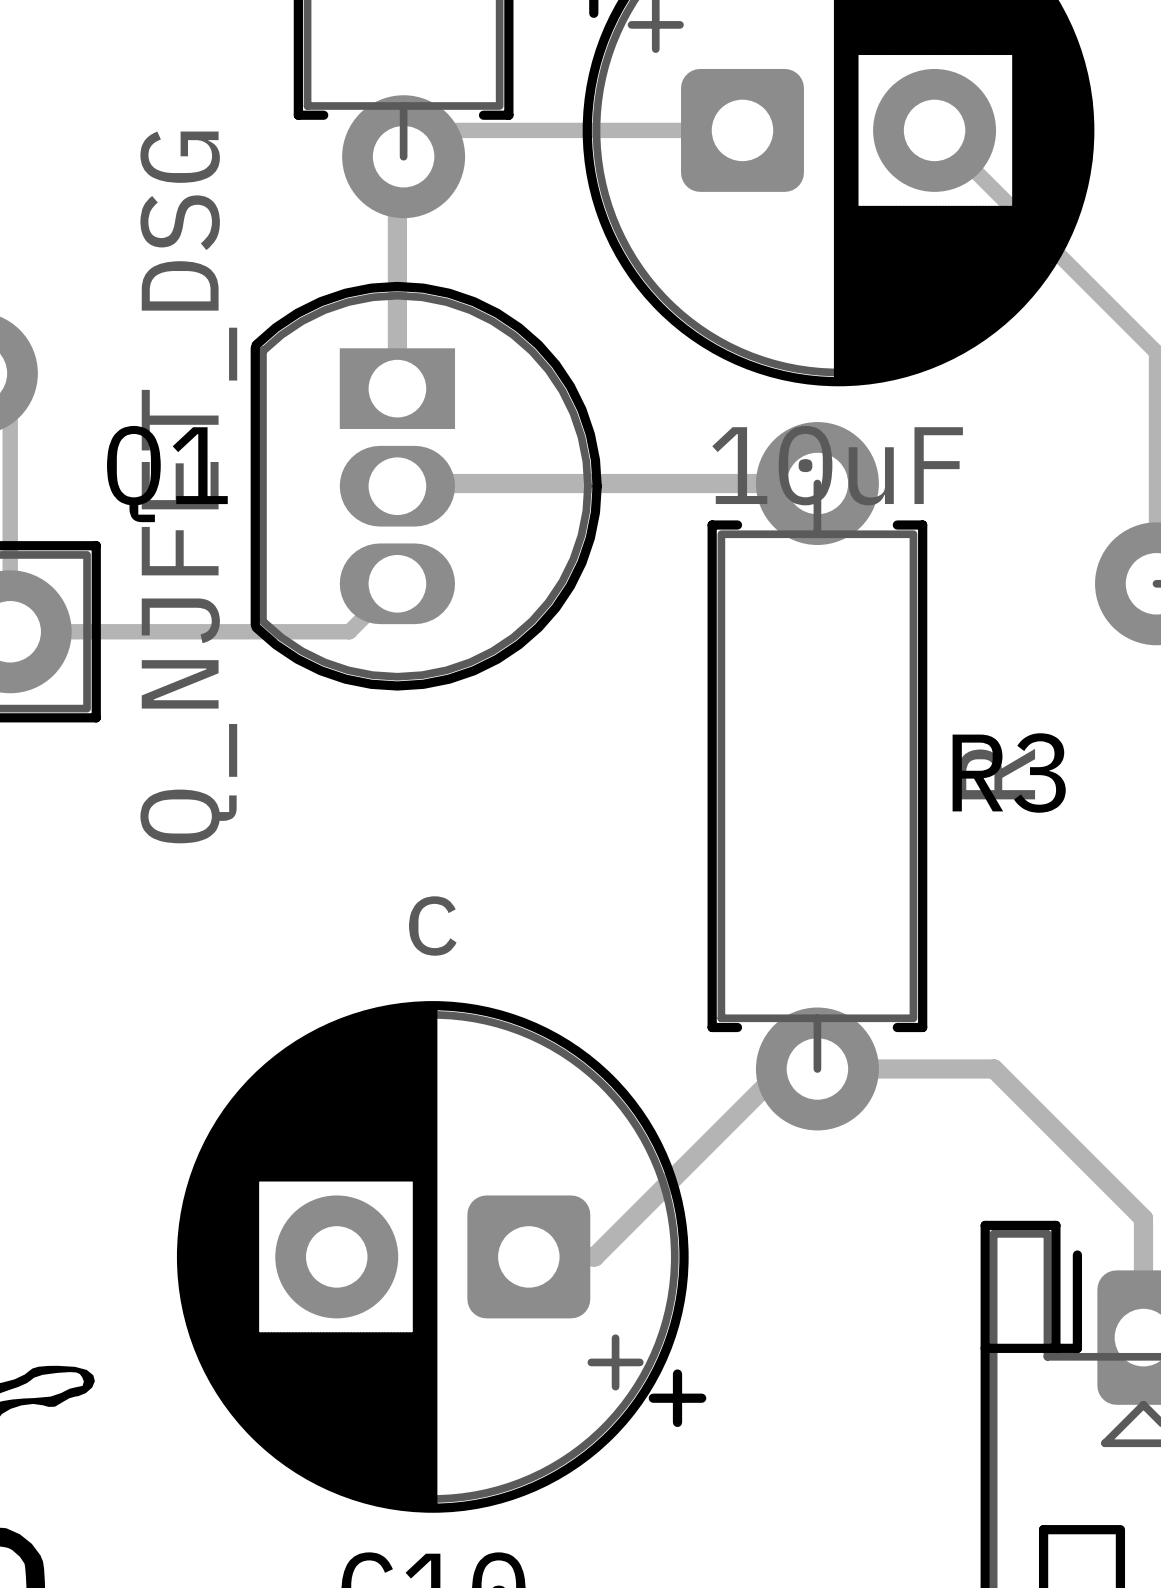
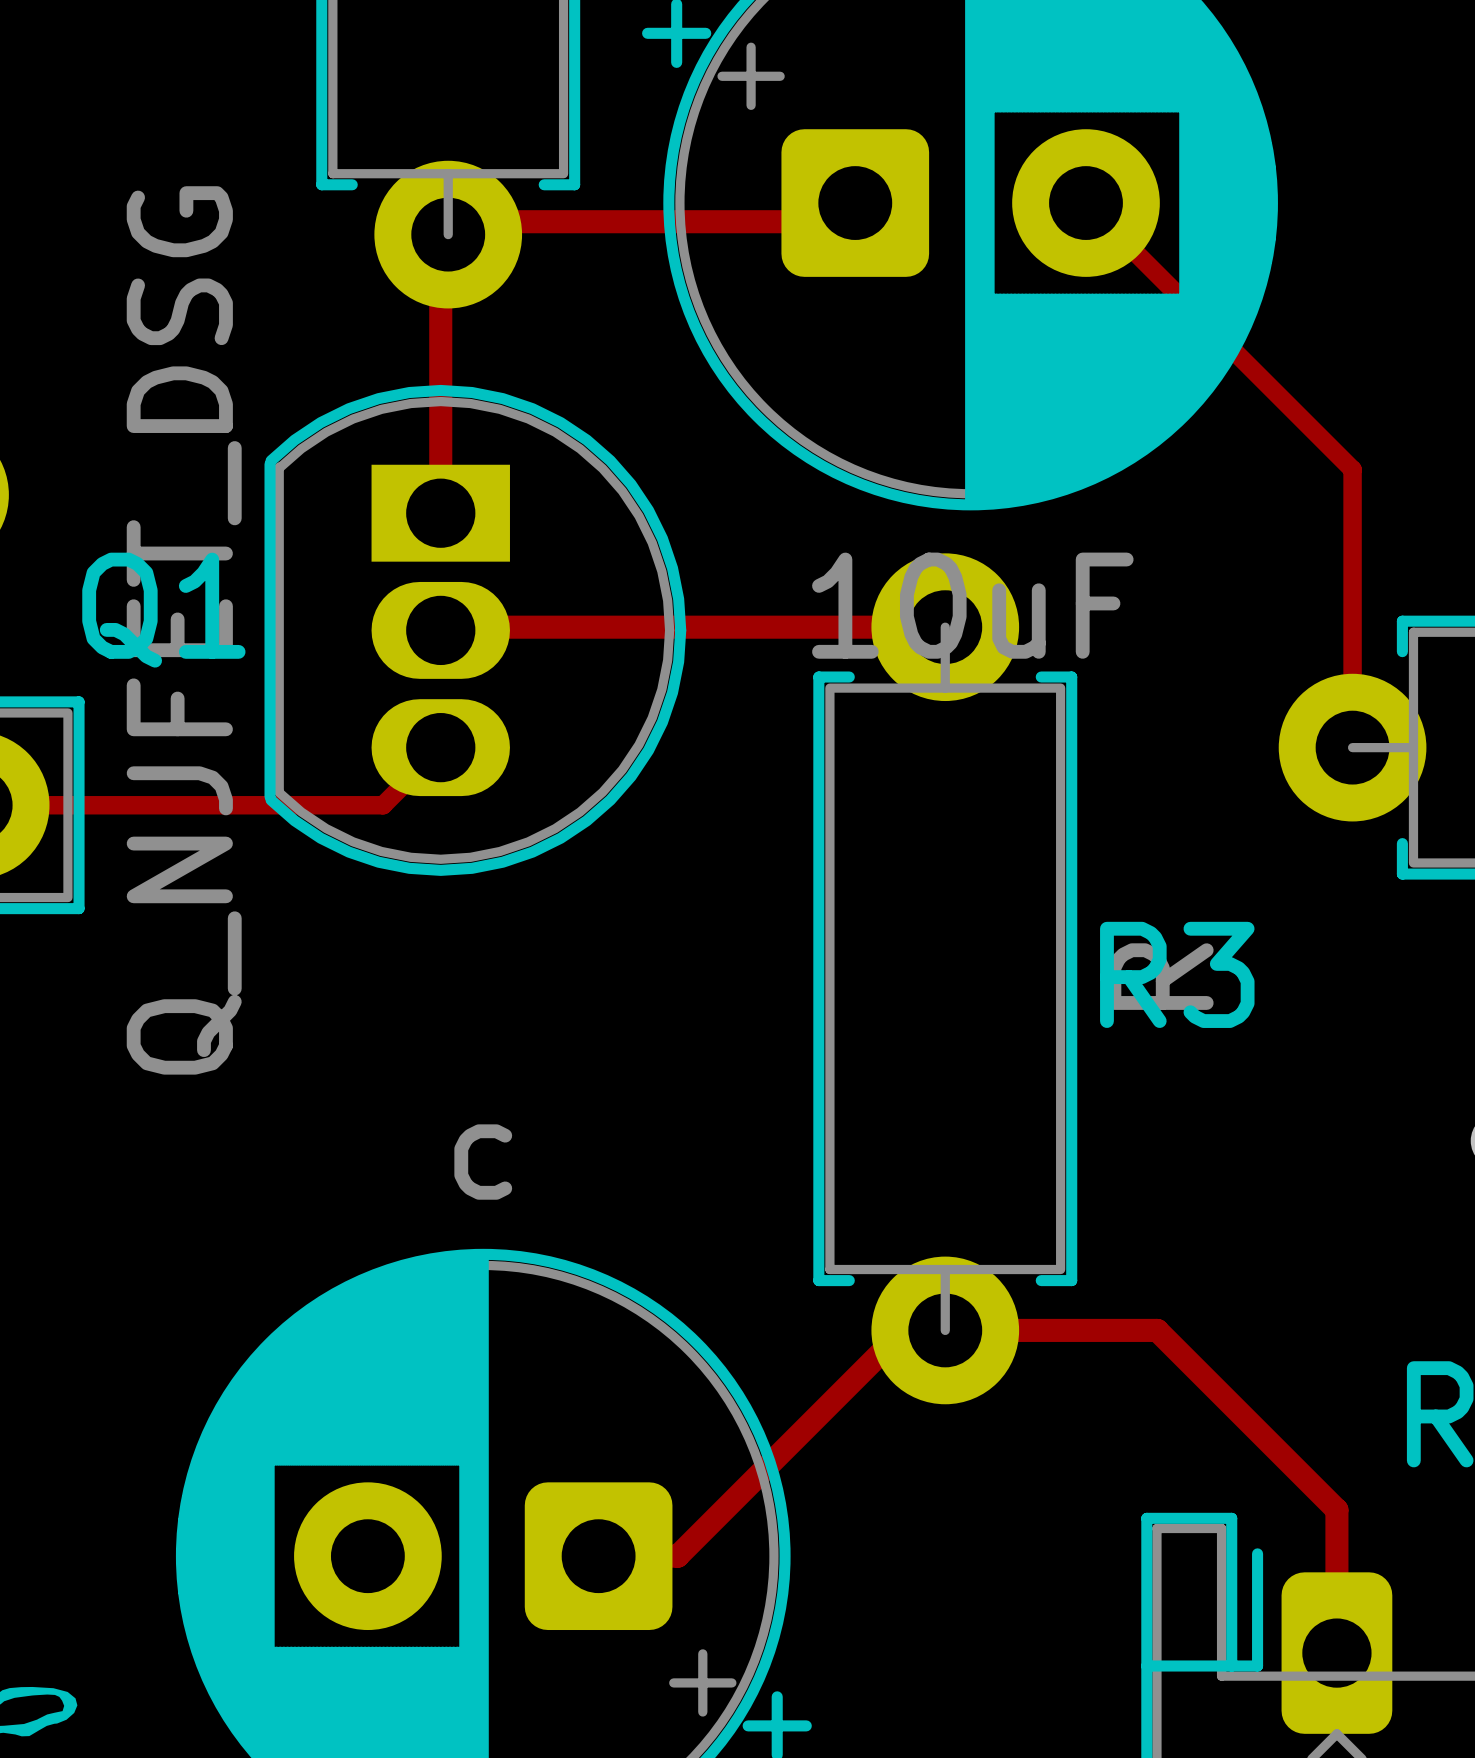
track: (742, 130) (429, 130) (414, 145) -> (848, 221) (461, 221)

